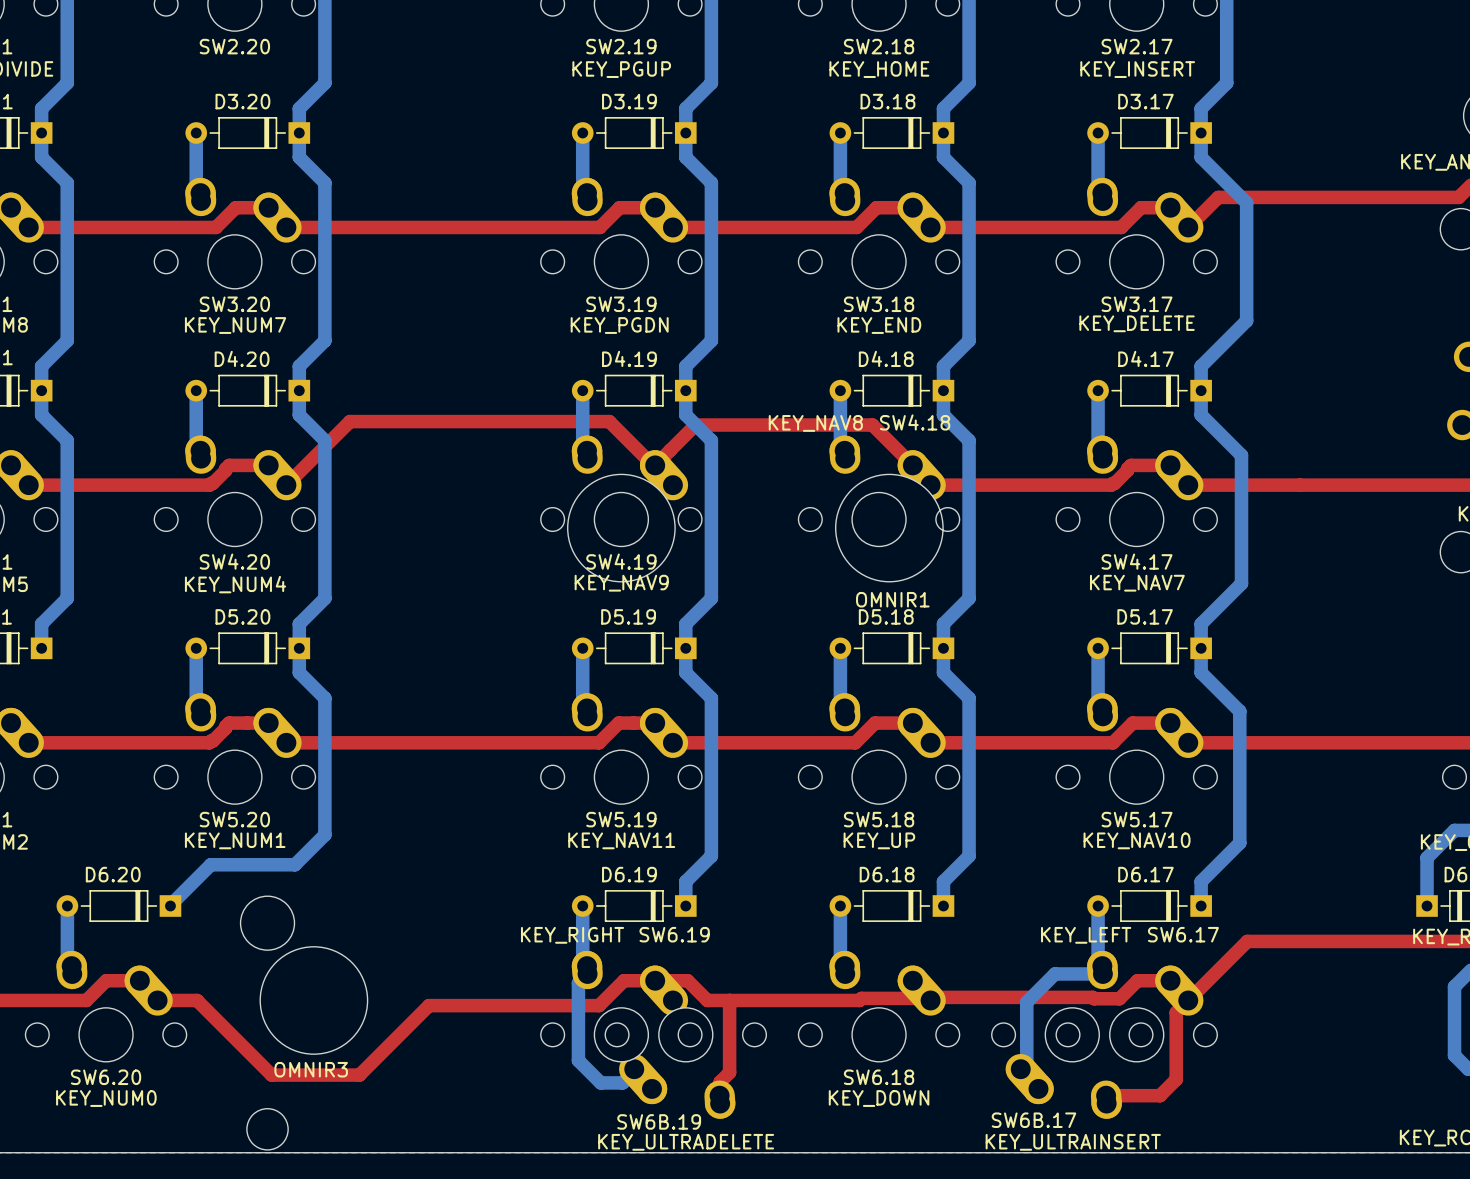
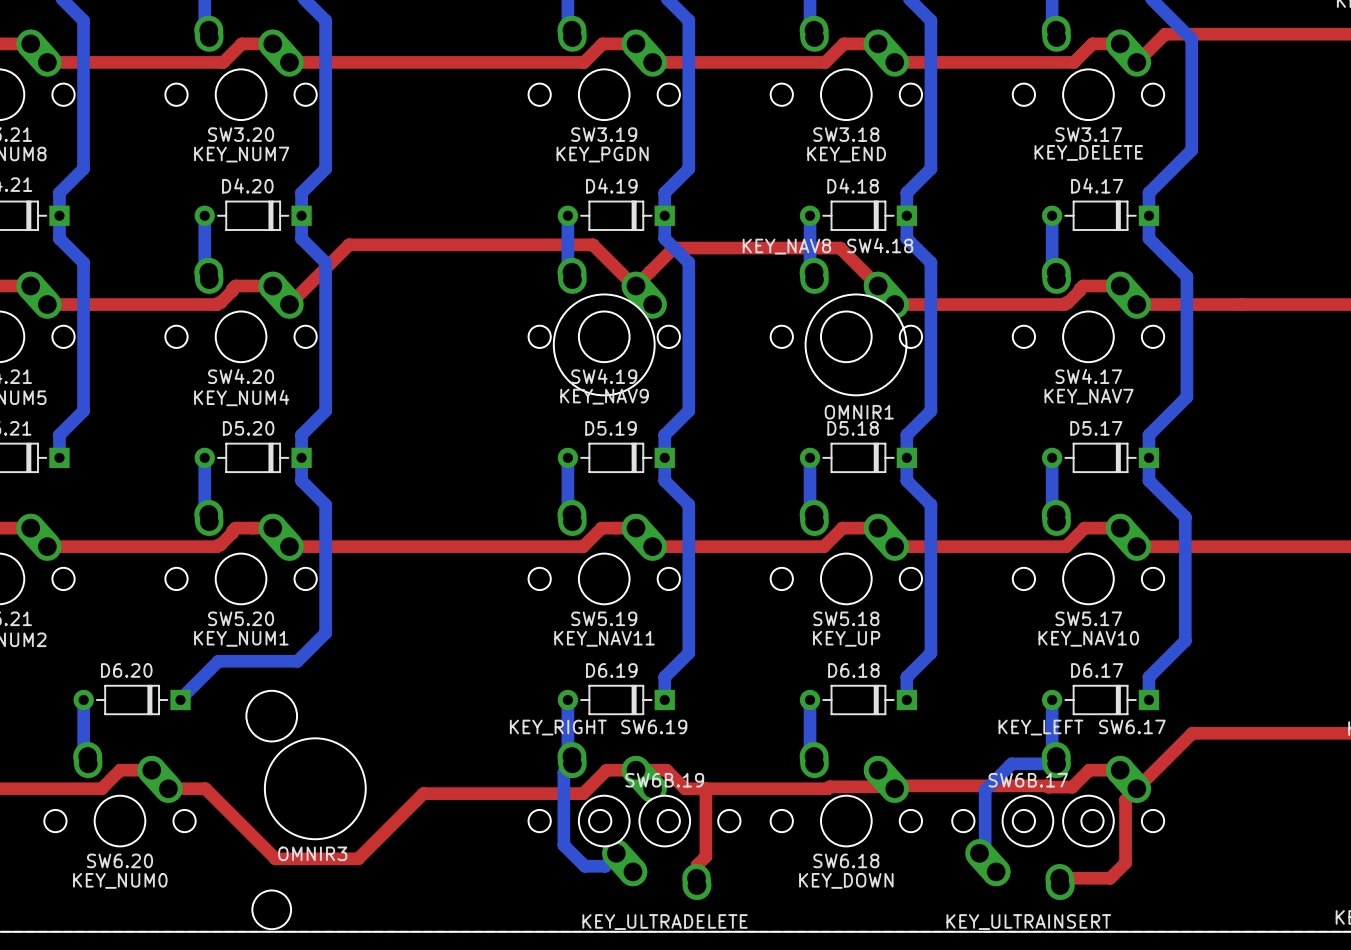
SW6B.17 name position: SW6B.17 (1033, 1120) -> SW6B.17 (1028, 780)
SW6B.19 name position: SW6B.19 (659, 1121) -> SW6B.19 (664, 780)

